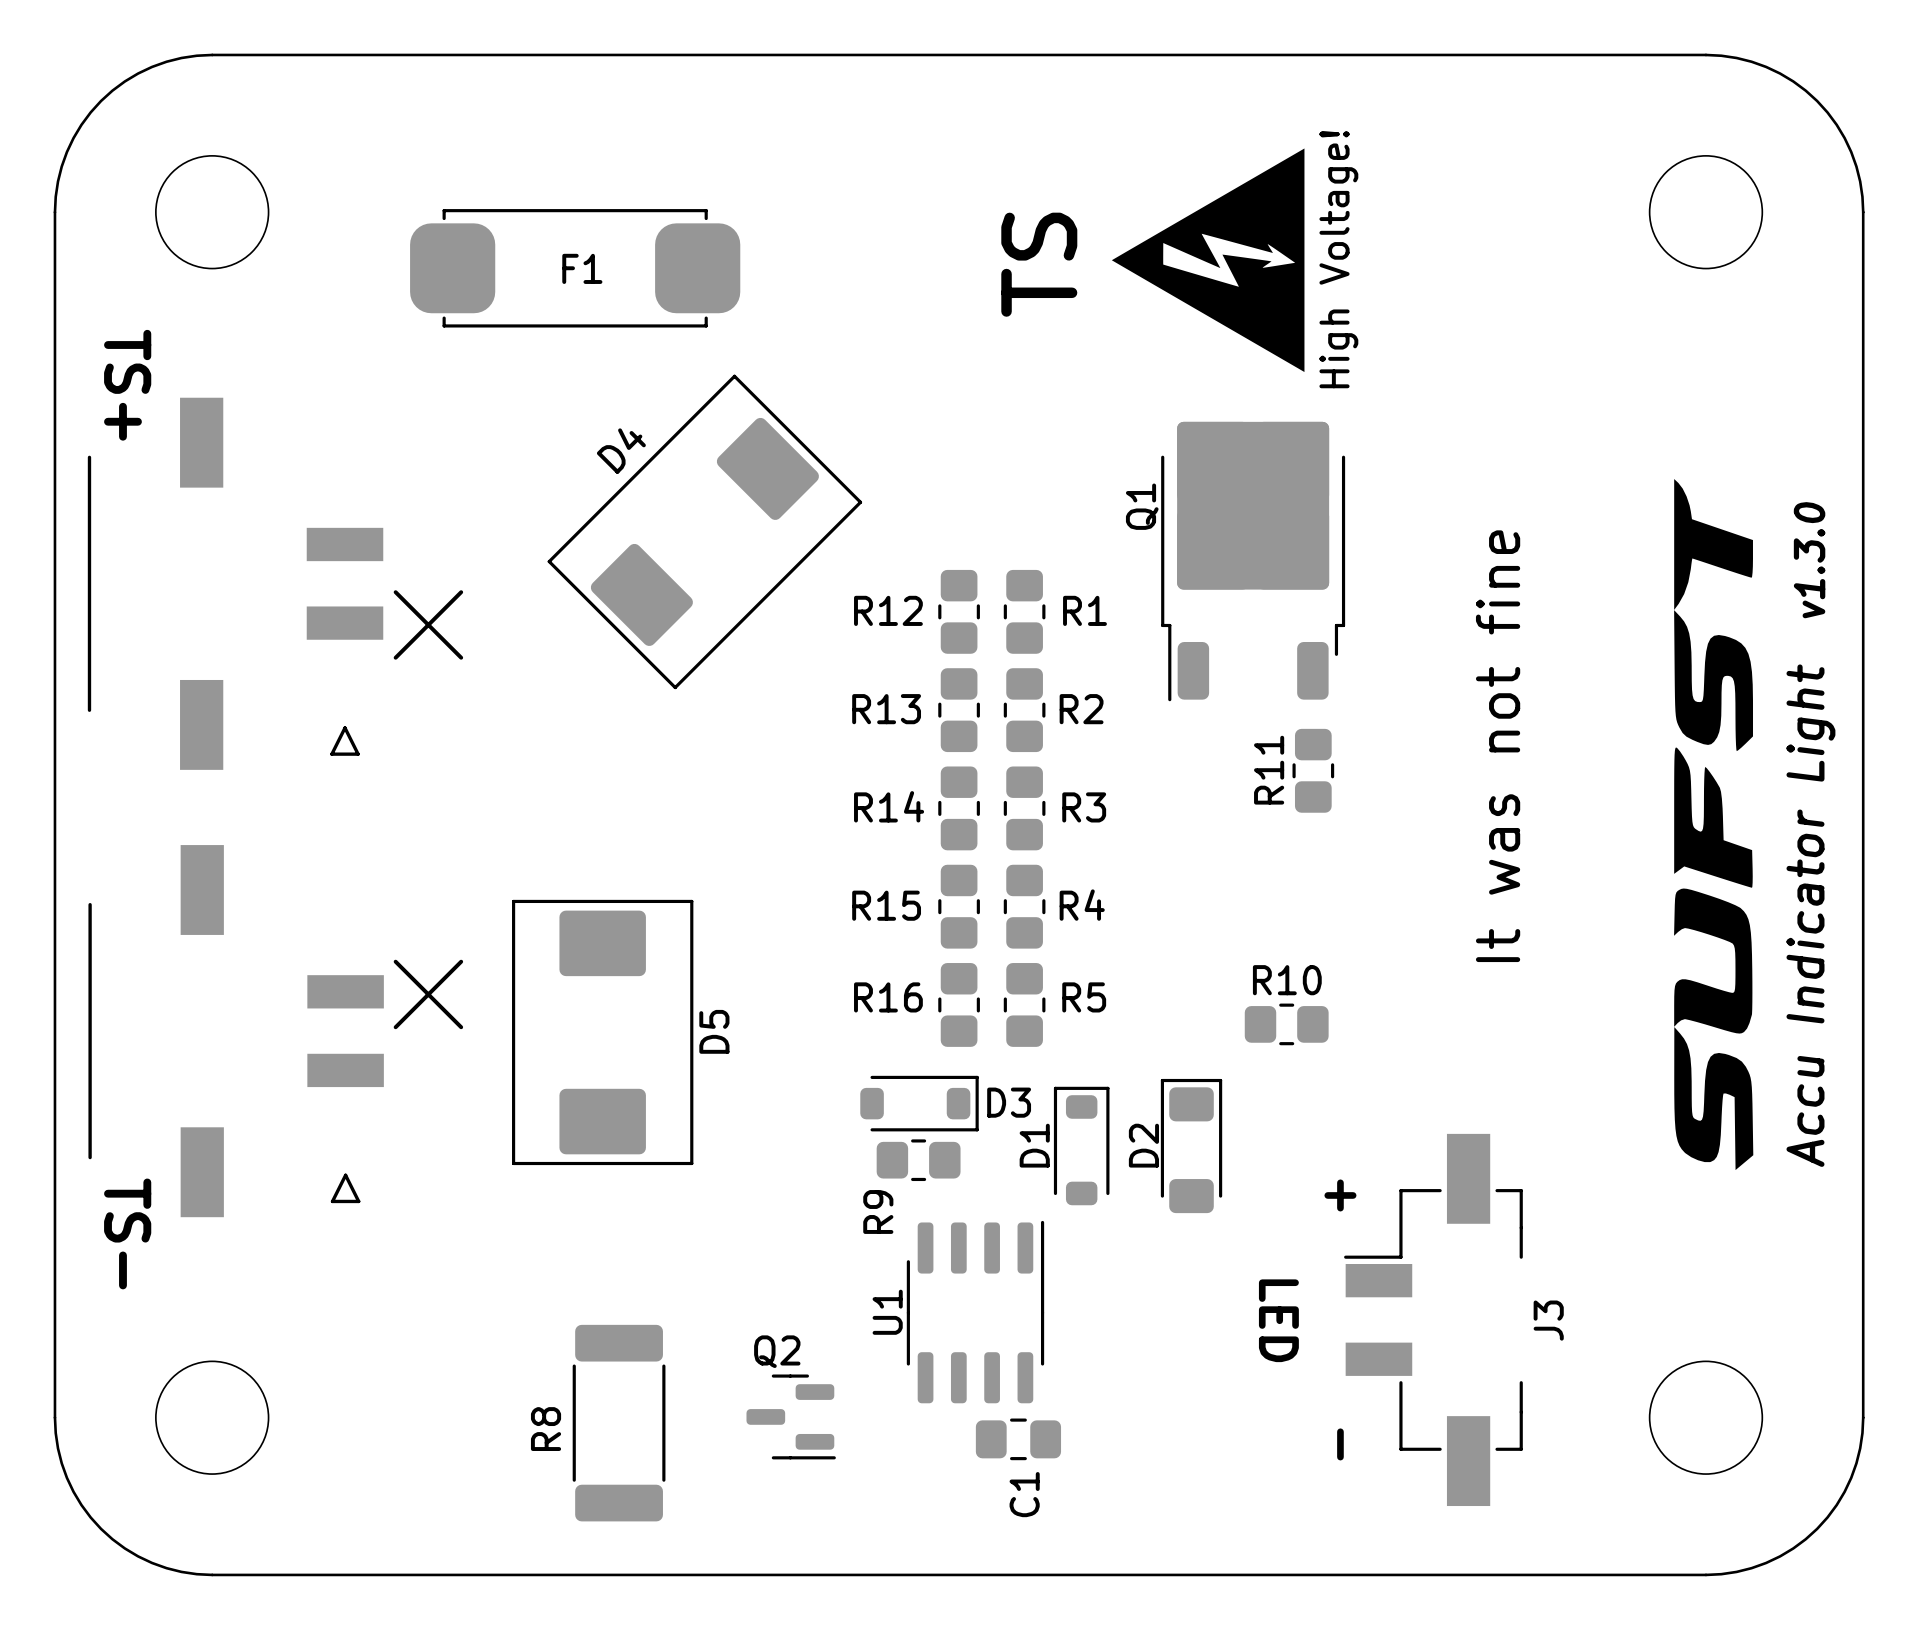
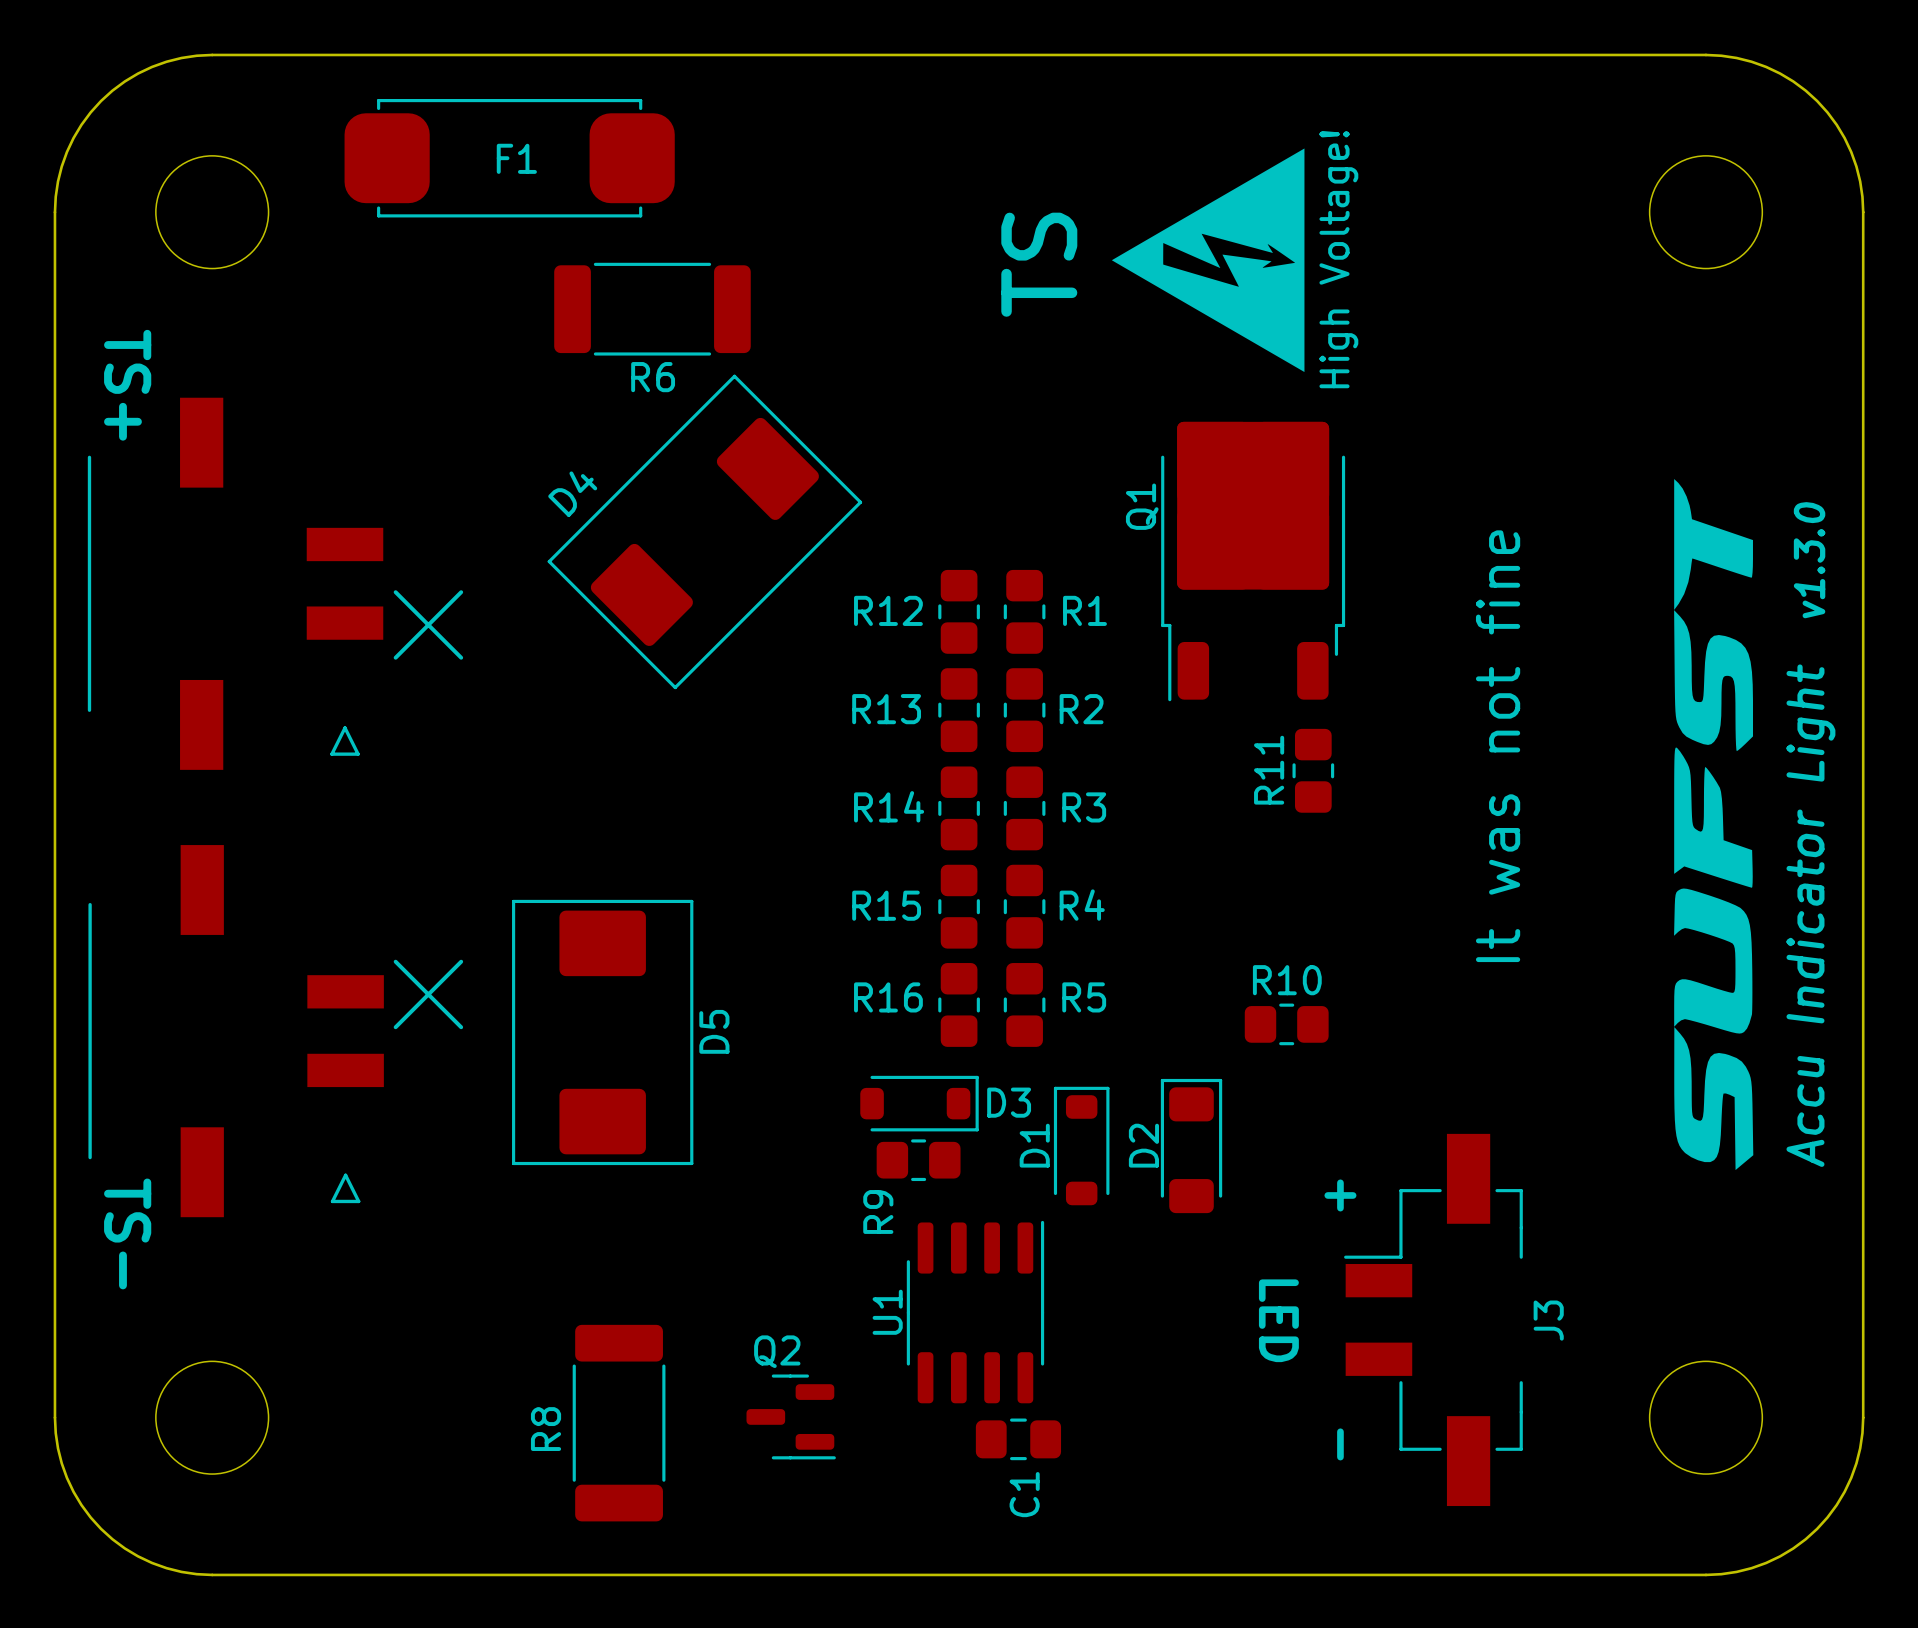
F1 position: (575, 268) -> (509, 158)
R6: none -> (652, 309)
D4 name position: D4 (621, 451) -> D4 (572, 494)

